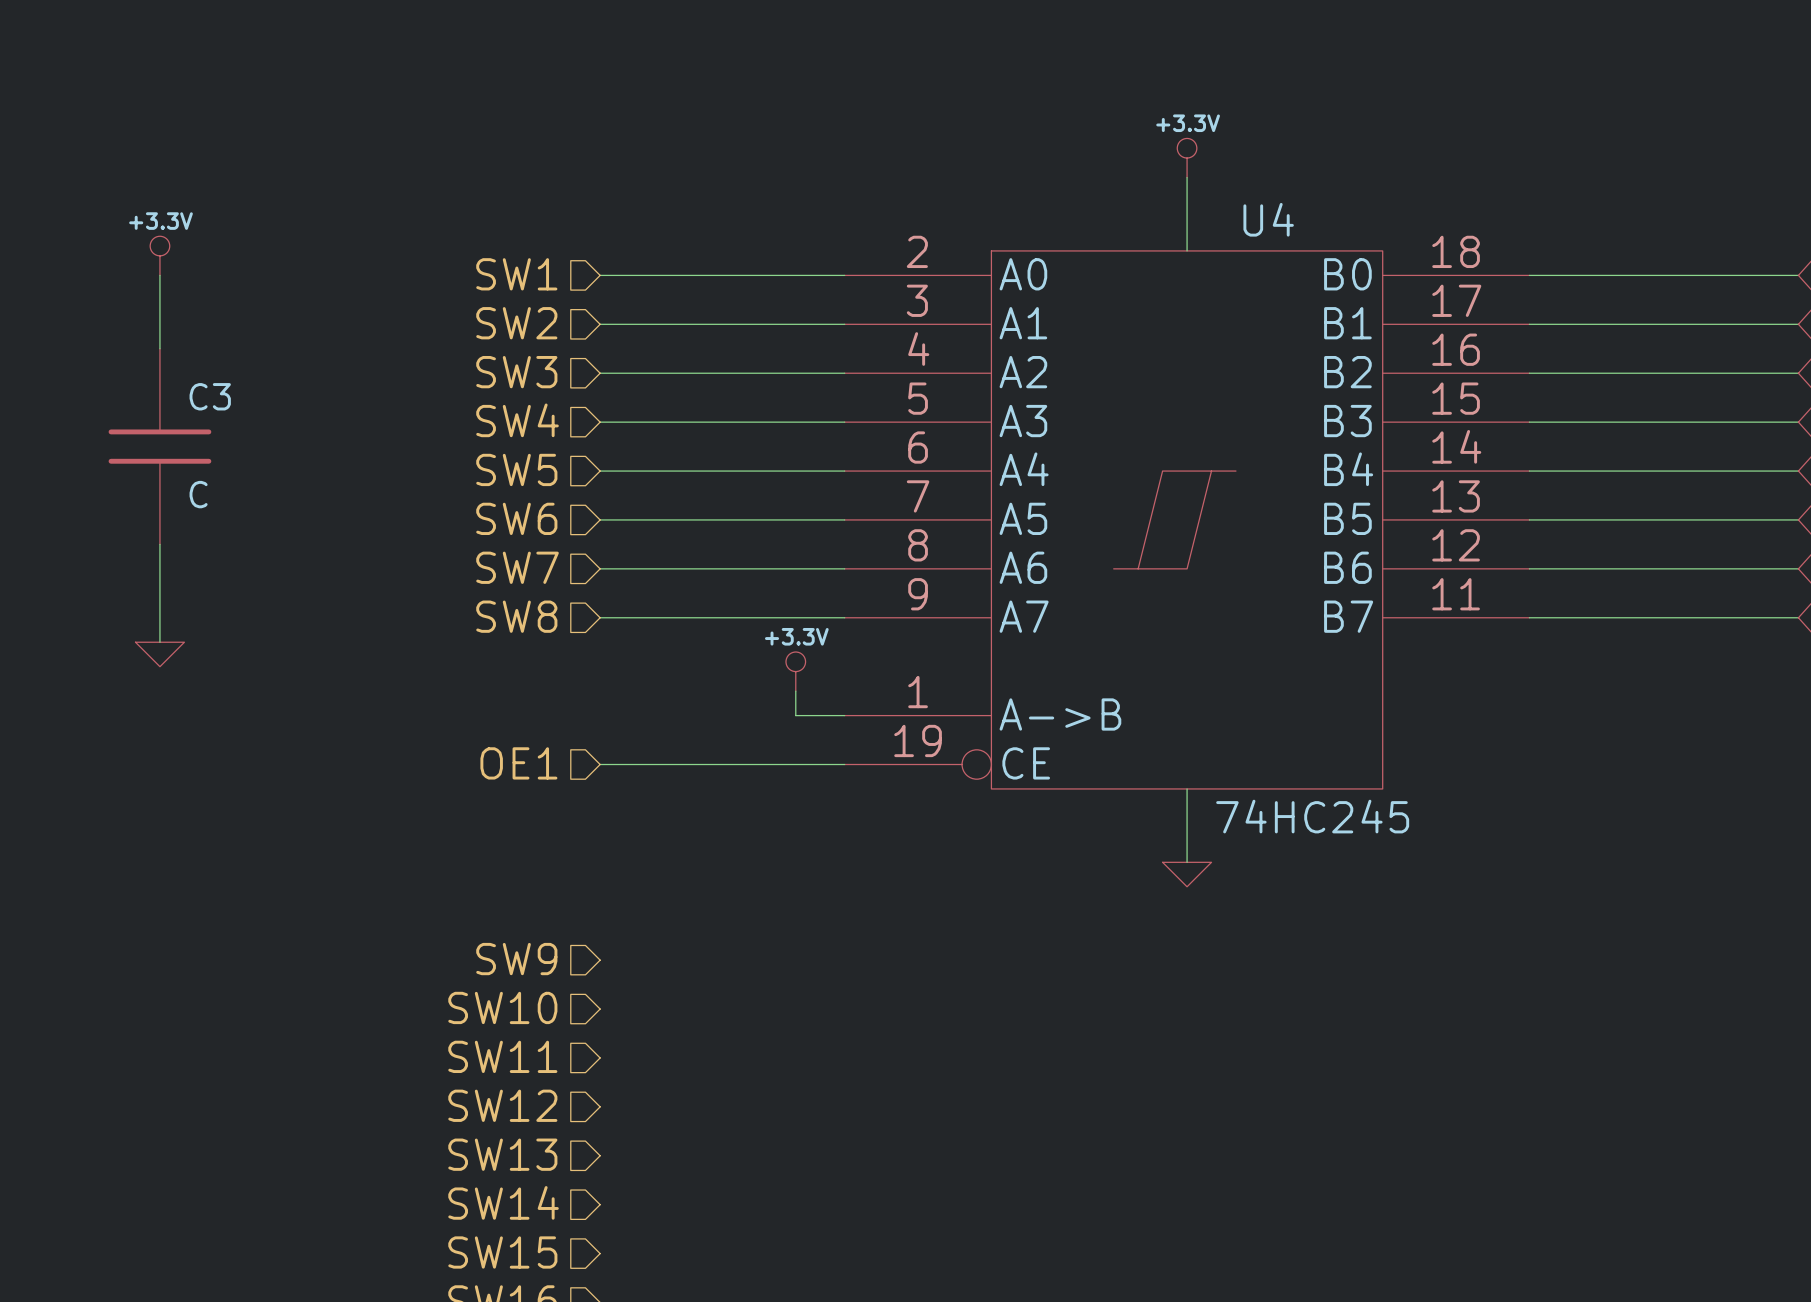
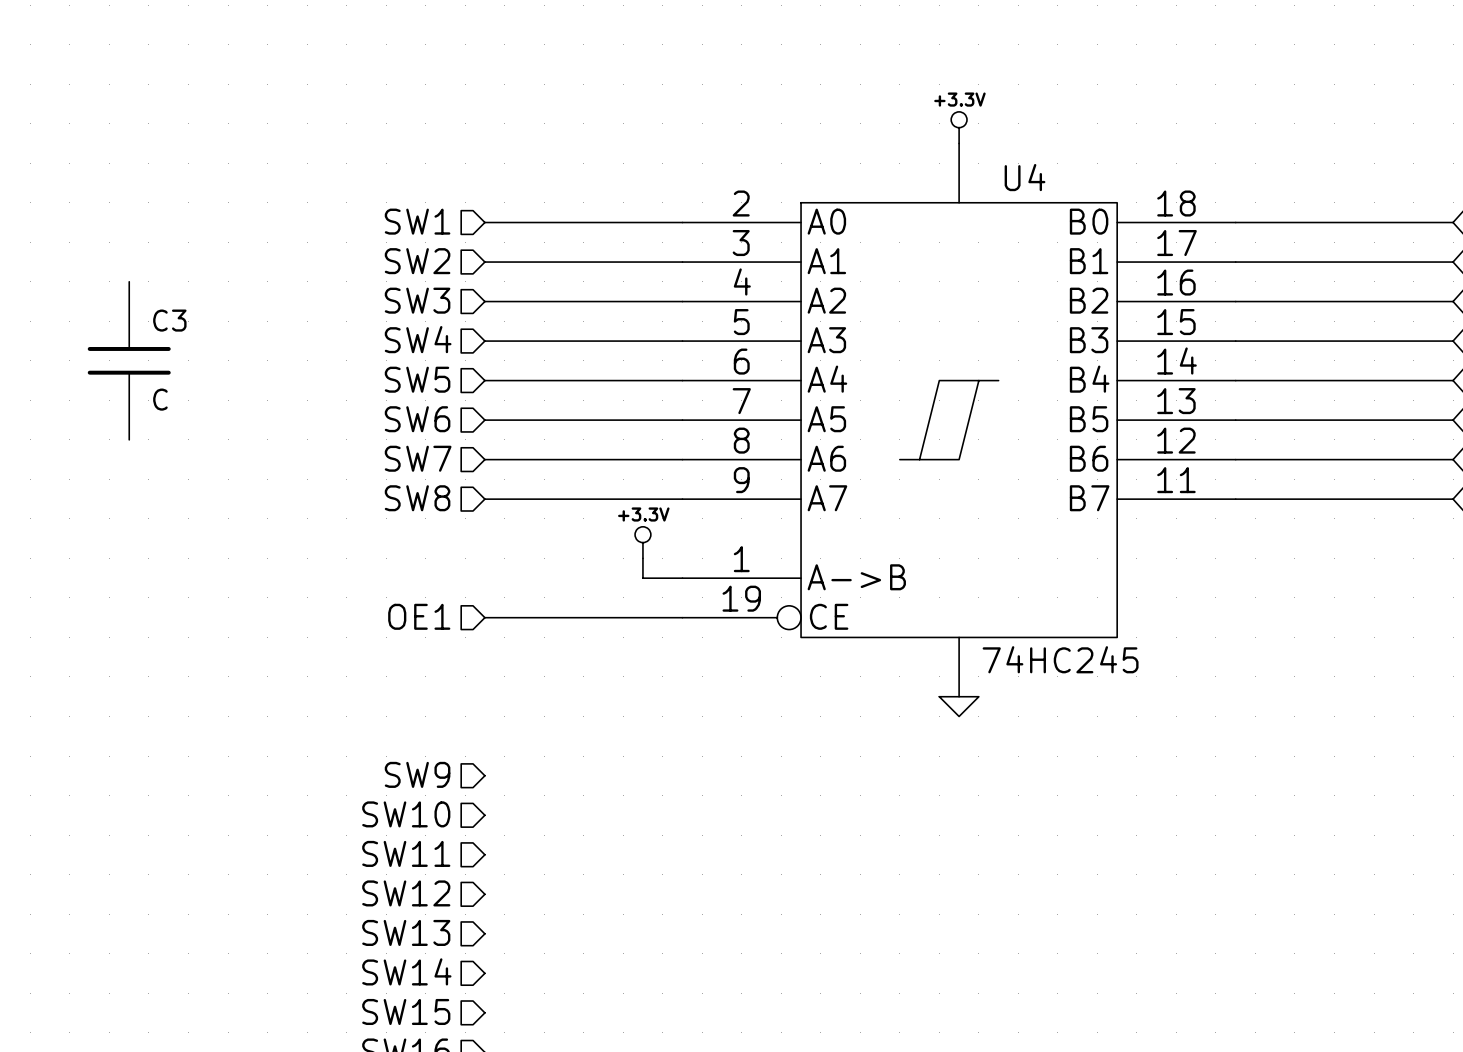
power symbol: +3.3V (159, 255) -> none
wire: (159, 275) (159, 348) -> none
wire: (159, 544) (159, 642) -> none
power symbol: (159, 654) -> none

